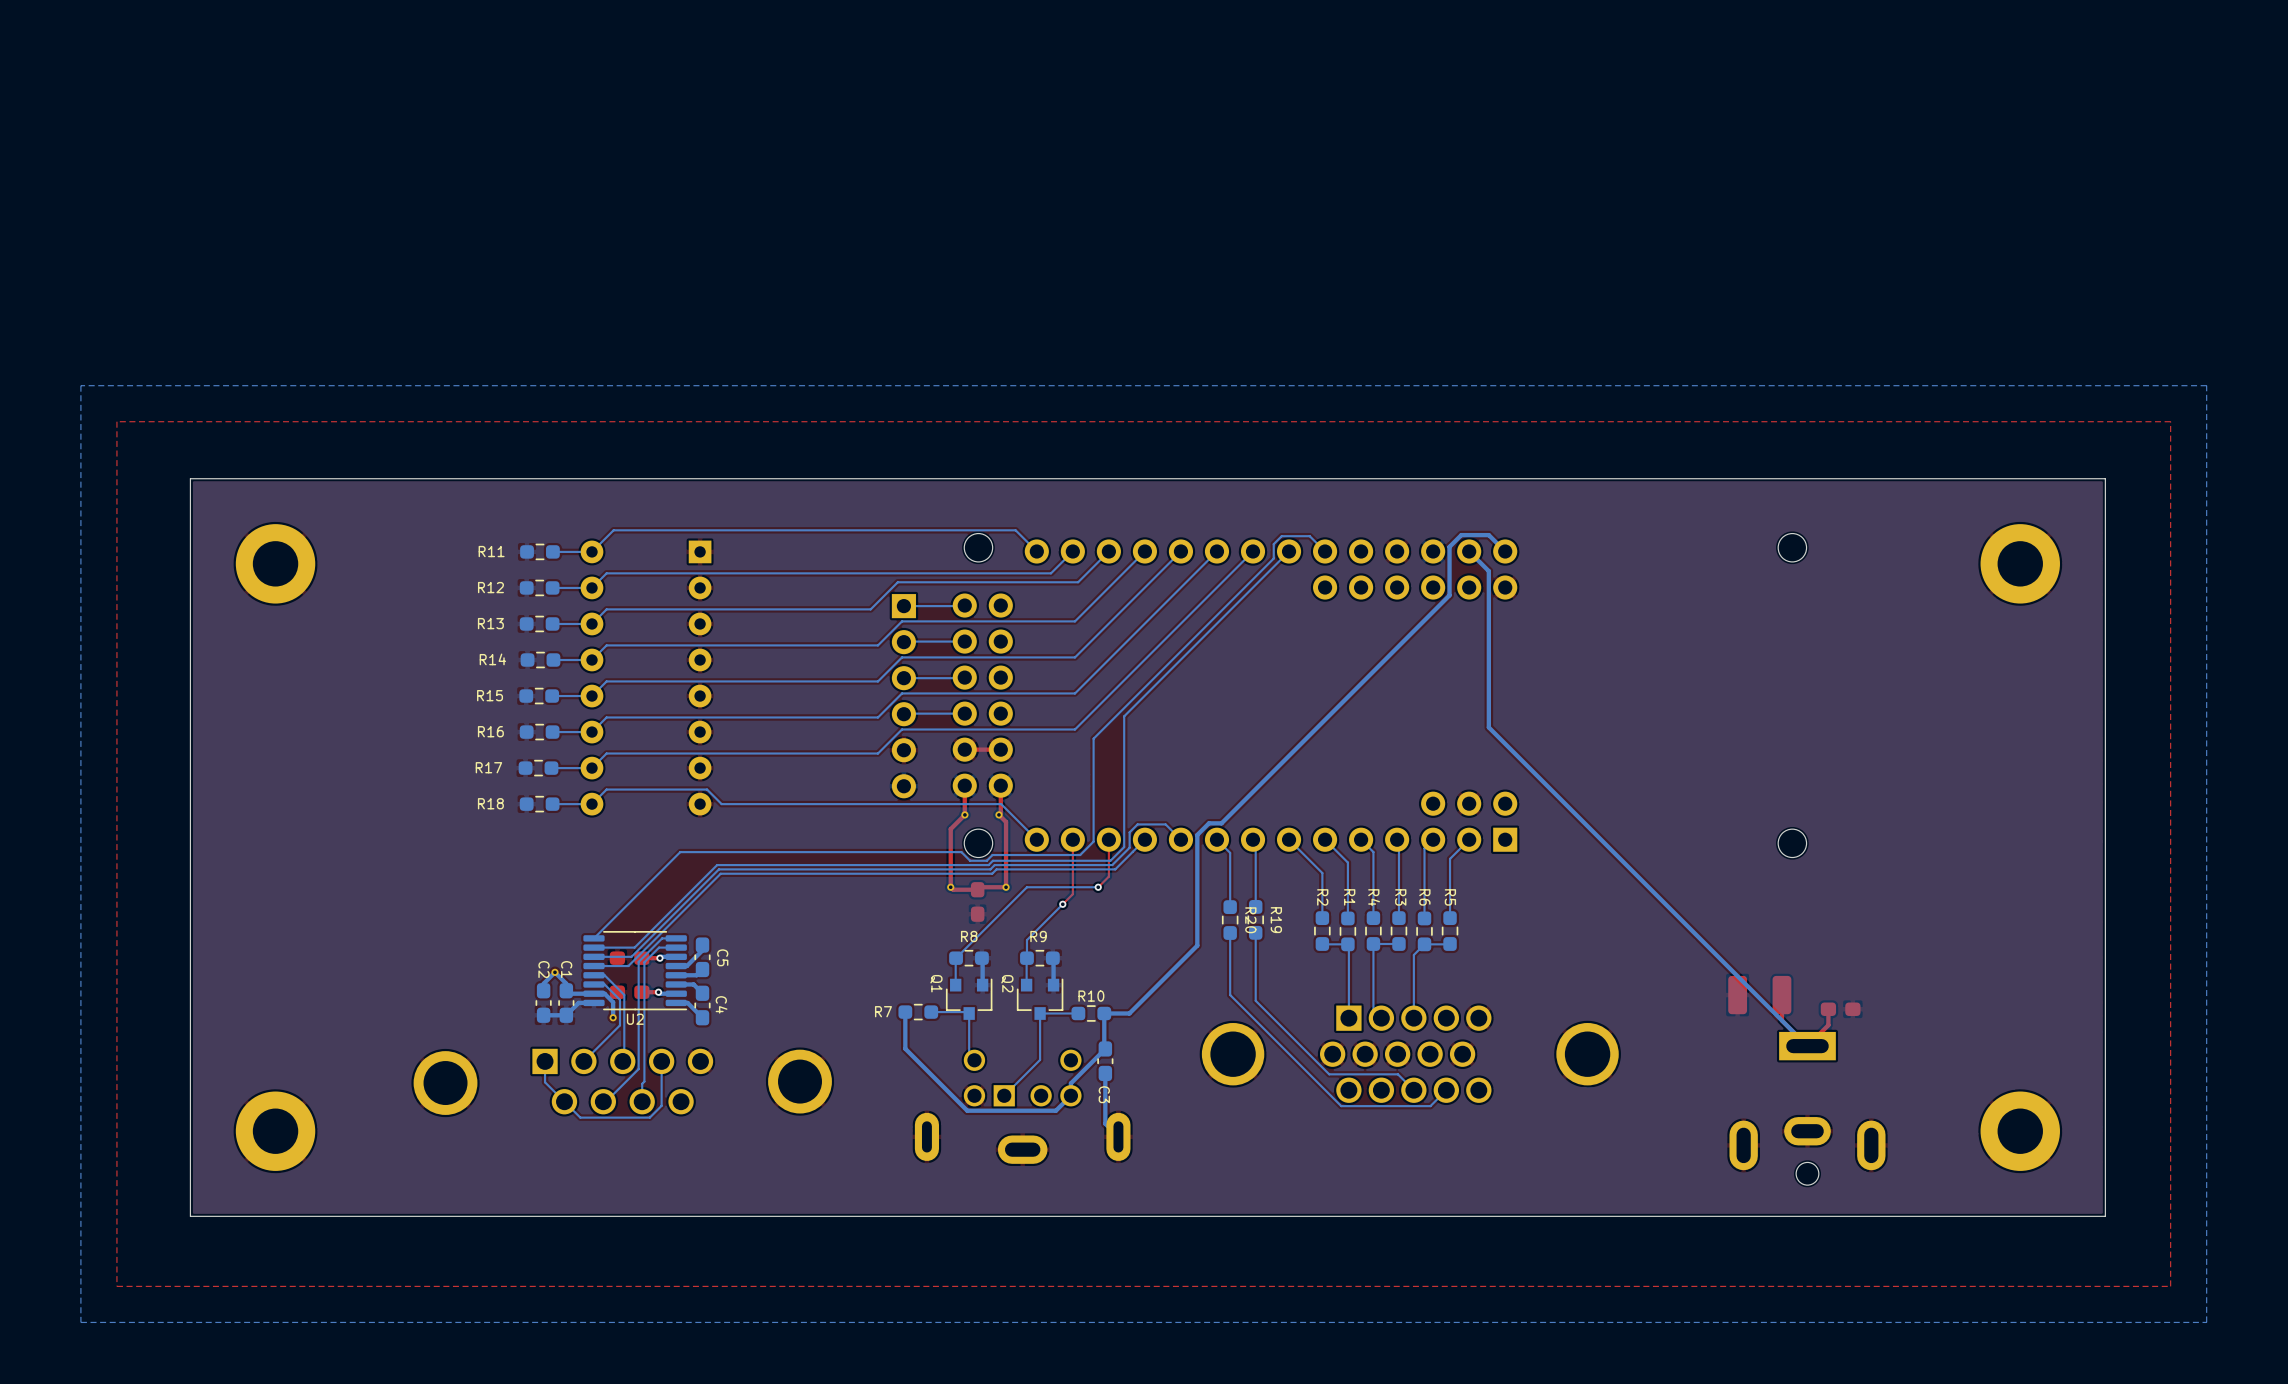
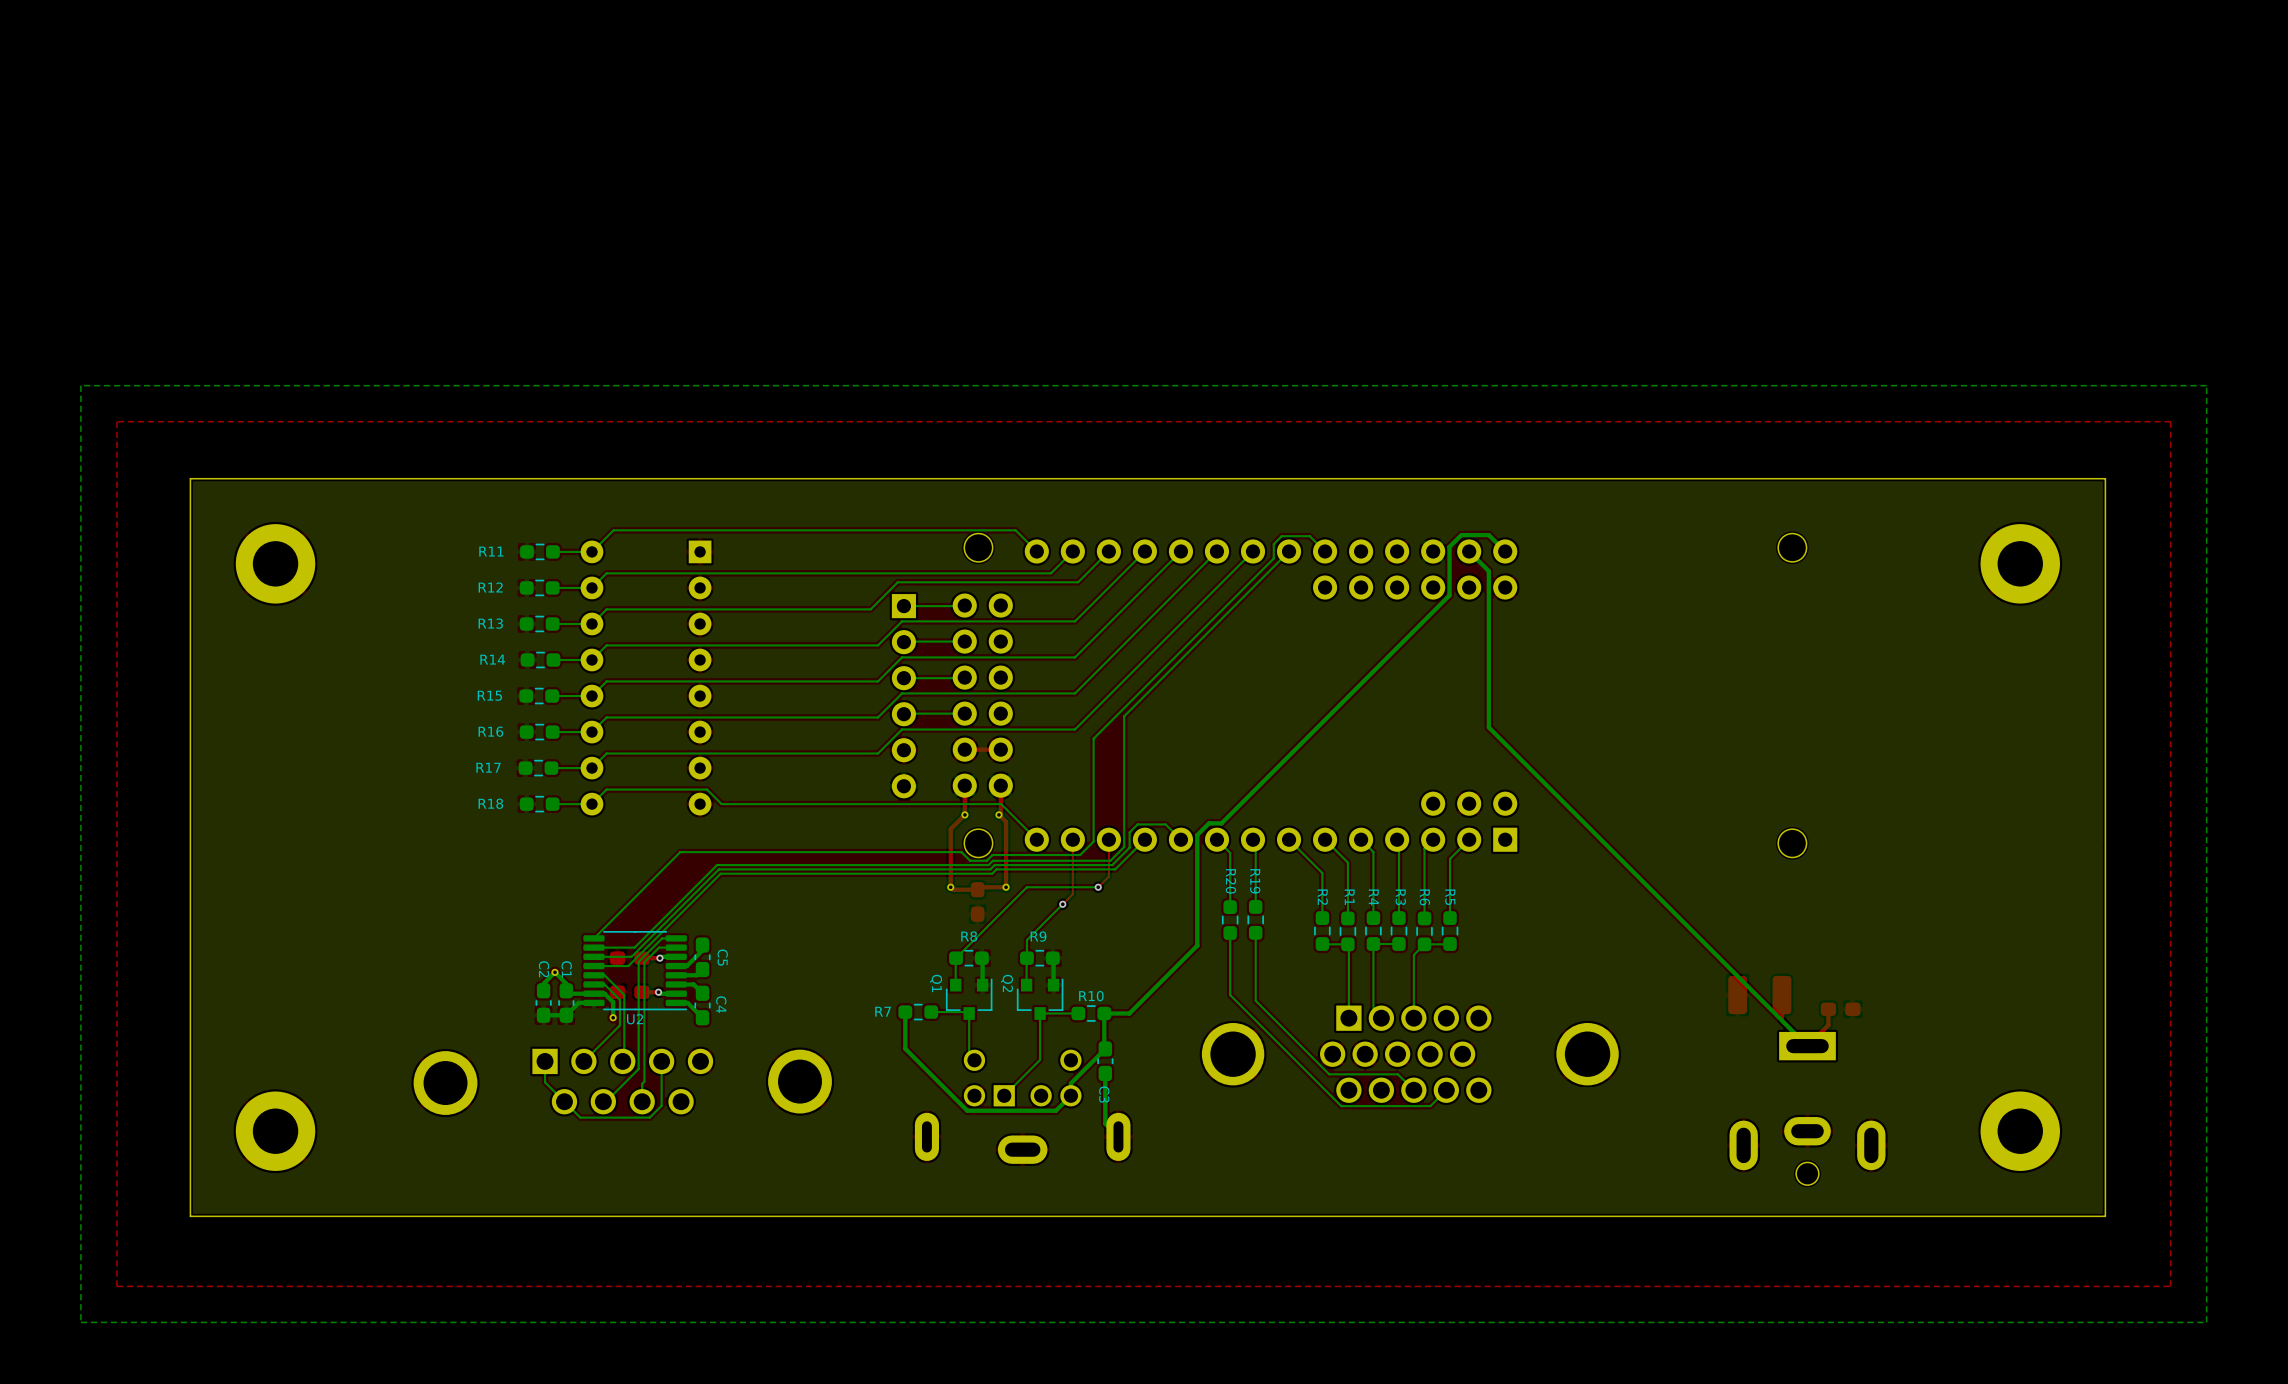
R20 name position: R20 (1250, 920) -> R20 (1230, 881)
R19 name position: R19 (1276, 920) -> R19 (1255, 881)

